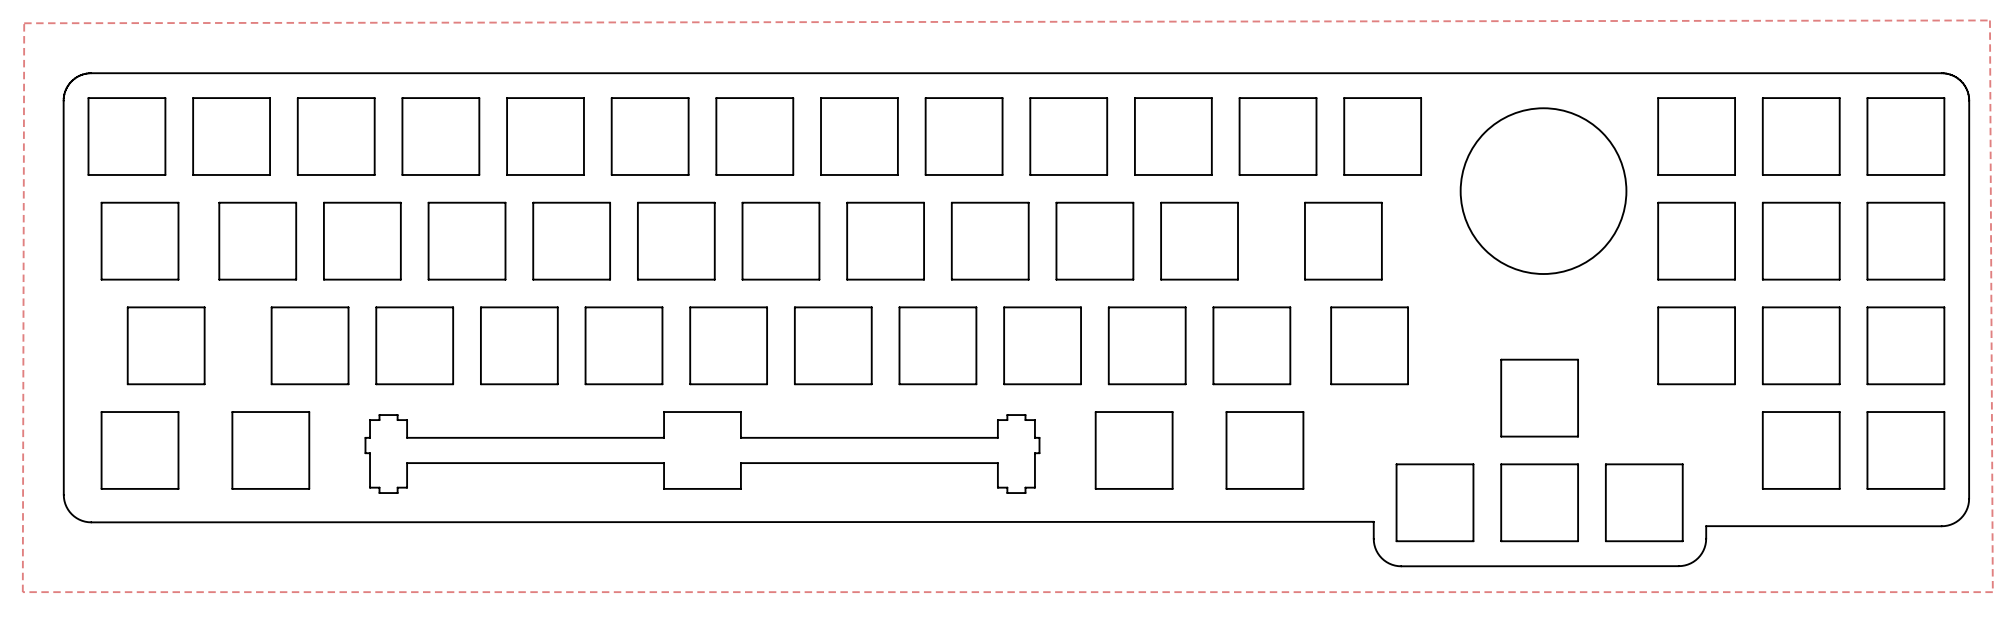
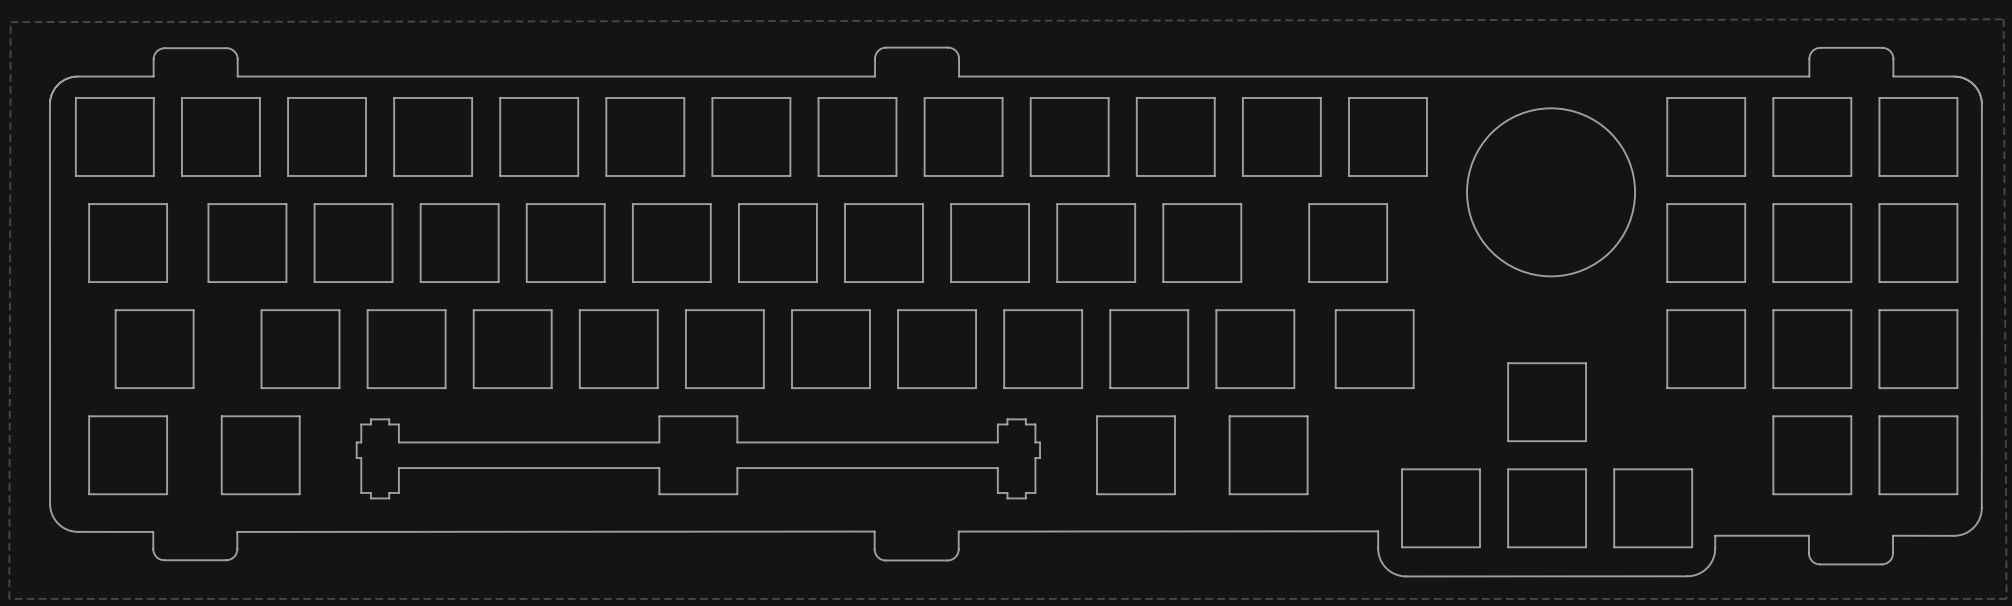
board edge: (91, 73) (1948, 73) (1962, 82) (1969, 98) (1968, 504) (1961, 518) (1953, 523) (1944, 526) (1706, 526) (1706, 541) (1701, 553) (1690, 563) (1678, 566) (1398, 566) (1384, 560) (1376, 550) (1373, 541) (1373, 521) (85, 521) (76, 518) (69, 512) (65, 503) (63, 494) (63, 100) (65, 90) (71, 81) (80, 75) (91, 73) -> (886, 47) (880, 49) (875, 55) (875, 76) (237, 76) (237, 56) (230, 48) (164, 48) (157, 50) (154, 55) (153, 76) (75, 76) (63, 80) (54, 89) (49, 104) (50, 504) (54, 518) (63, 527) (74, 531) (153, 531) (153, 552) (157, 557) (164, 560) (229, 559) (237, 551) (237, 531) (874, 531) (874, 551) (882, 559) (947, 560) (953, 558) (958, 553) (958, 531) (1378, 531) (1378, 551) (1382, 563) (1391, 572) (1406, 576) (1690, 576) (1702, 572) (1710, 563) (1715, 551) (1715, 535) (1808, 535) (1809, 555) (1816, 563) (1883, 564) (1888, 561) (1892, 556) (1893, 535) (1960, 535) (1971, 529) (1979, 520) (1981, 508) (1981, 104) (1977, 89) (1964, 78) (1954, 76) (1893, 76) (1892, 55) (1889, 50) (1882, 47) (1816, 48) (1809, 56) (1809, 76) (959, 76) (958, 56) (951, 48) (886, 47)

